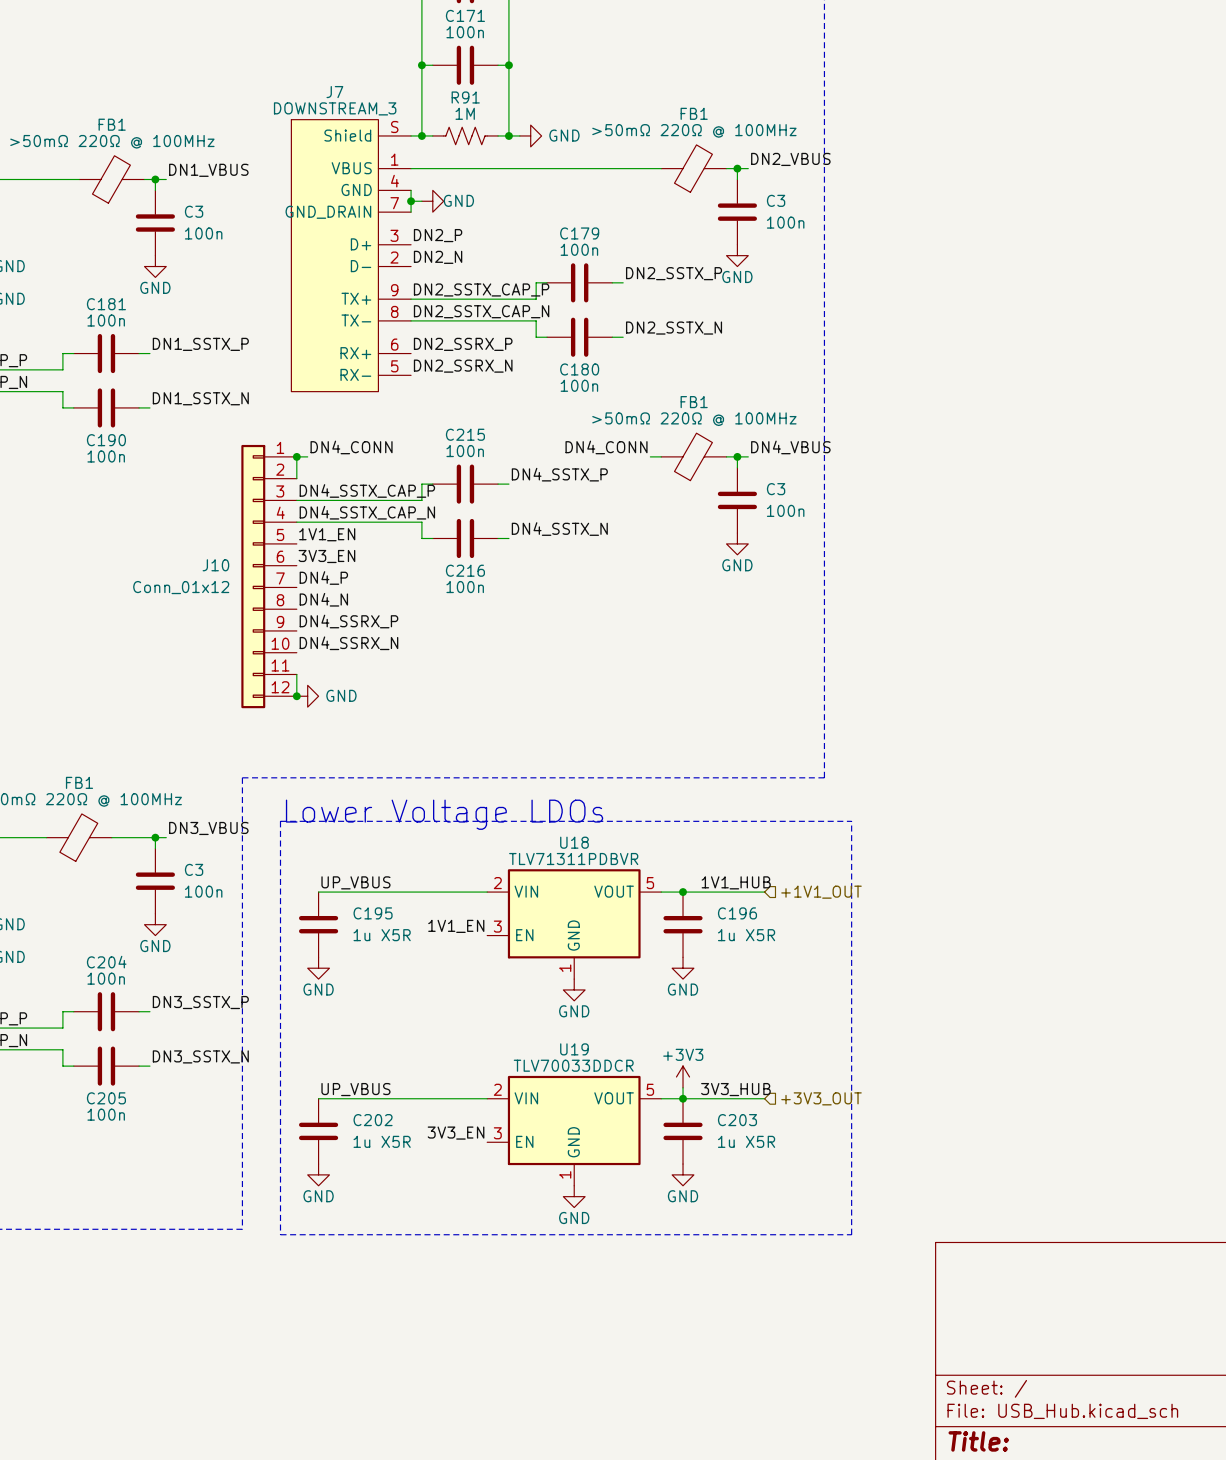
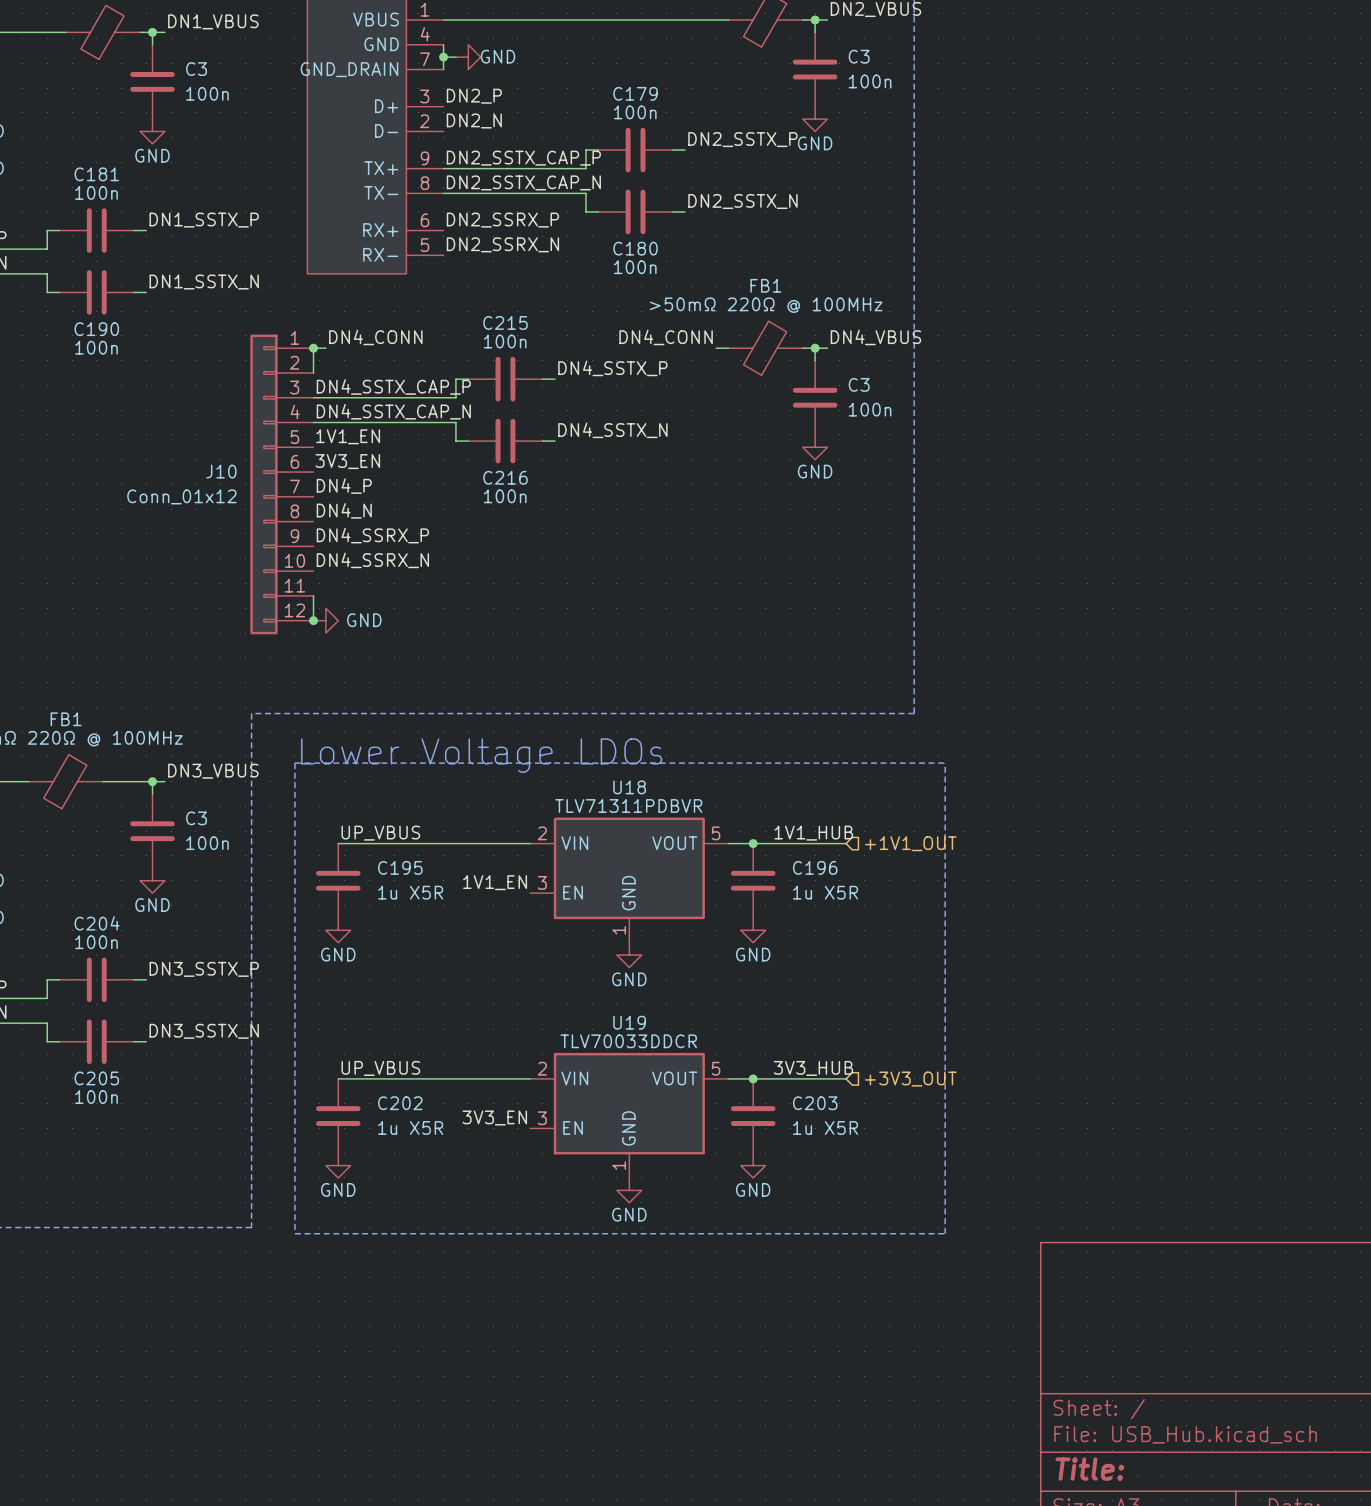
power symbol: +3V3 (683, 1076) -> none
wire: (683, 1087) (683, 1098) -> none

